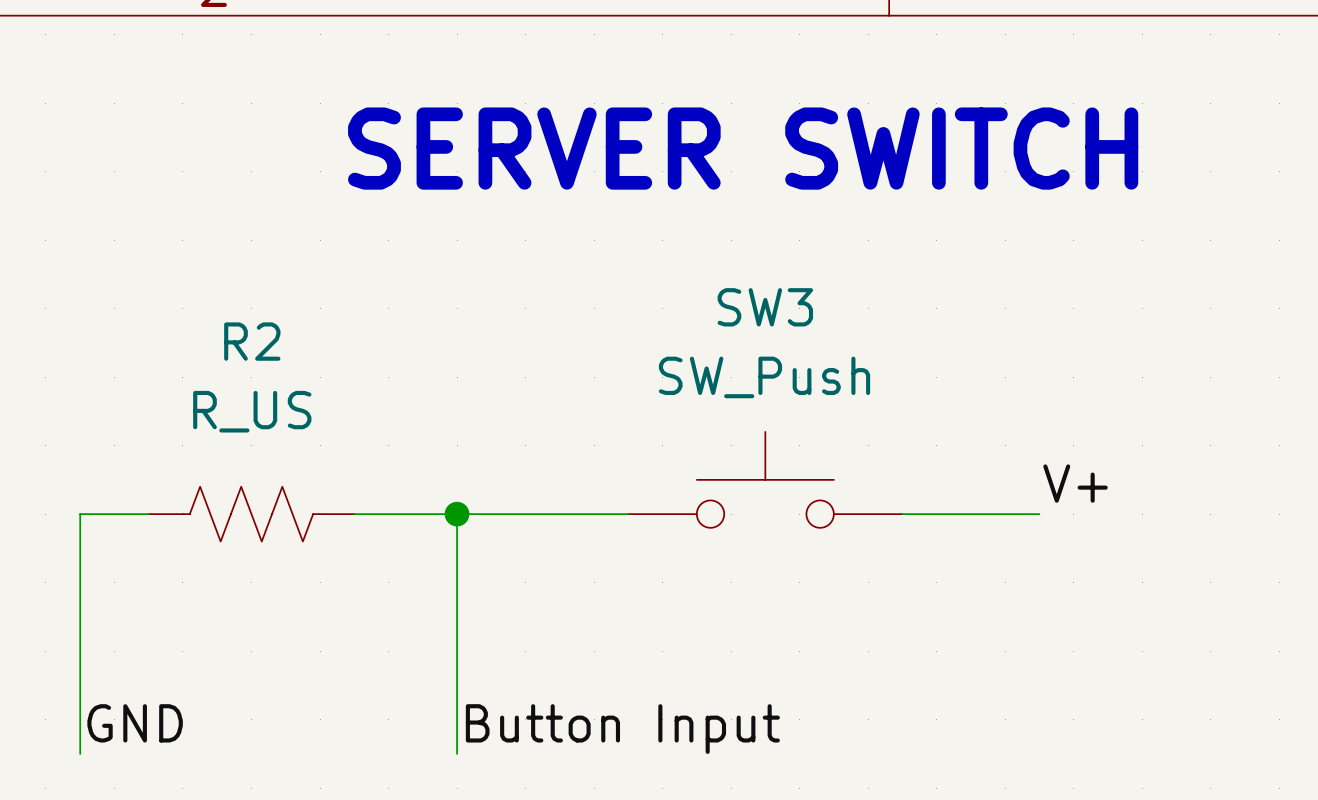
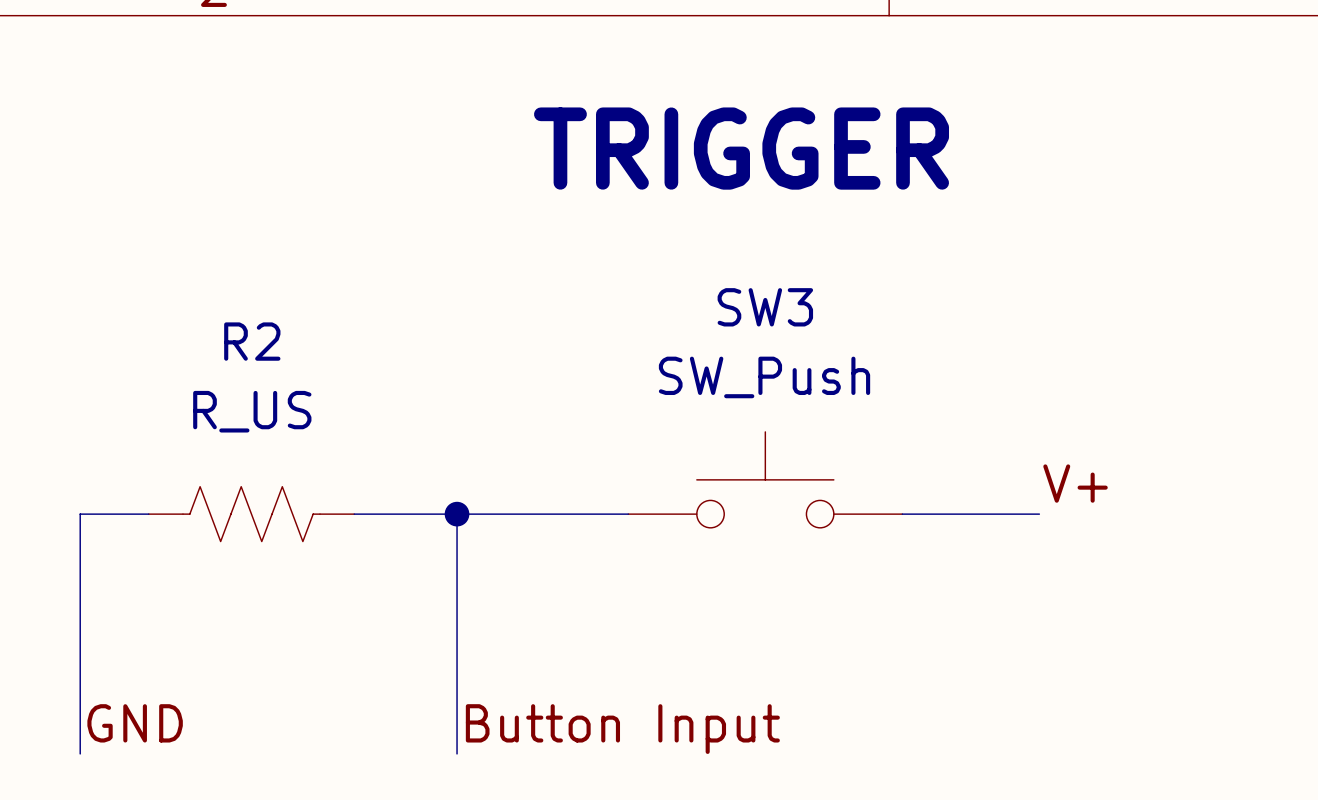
text: SERVER SWITCH (743, 148) -> TRIGGER (741, 148)

